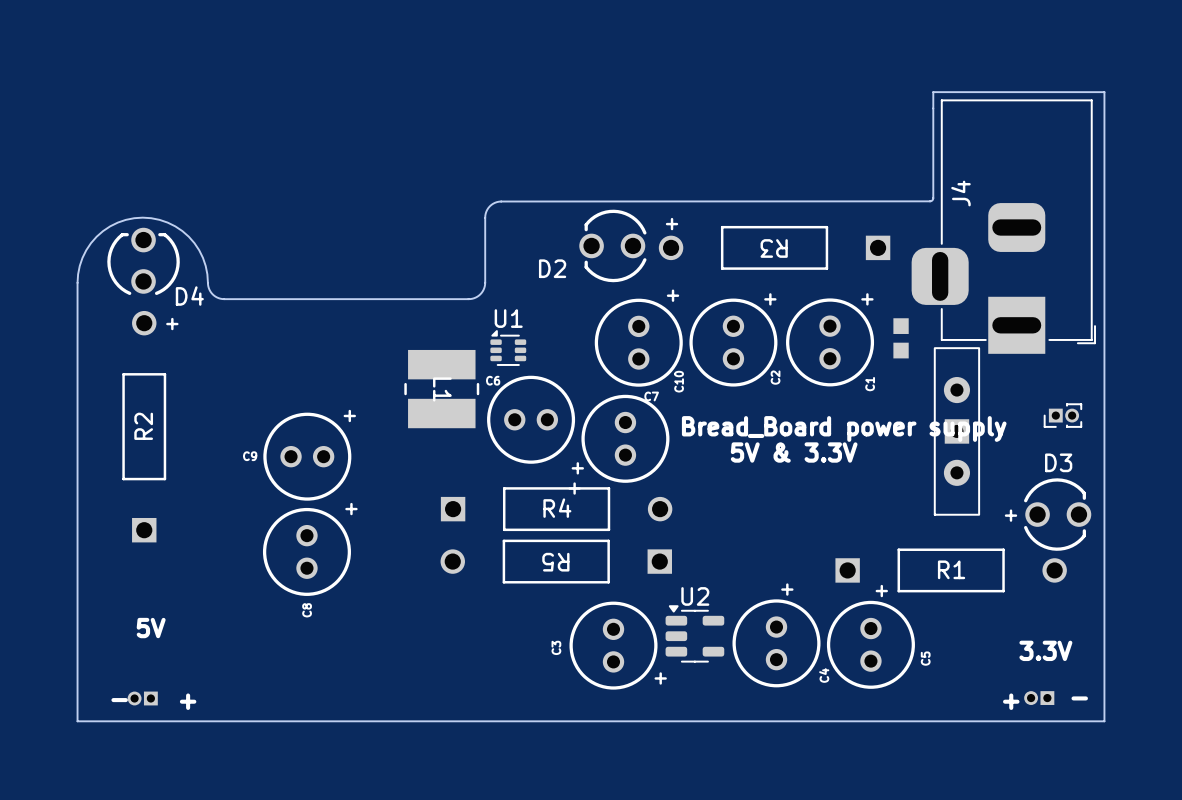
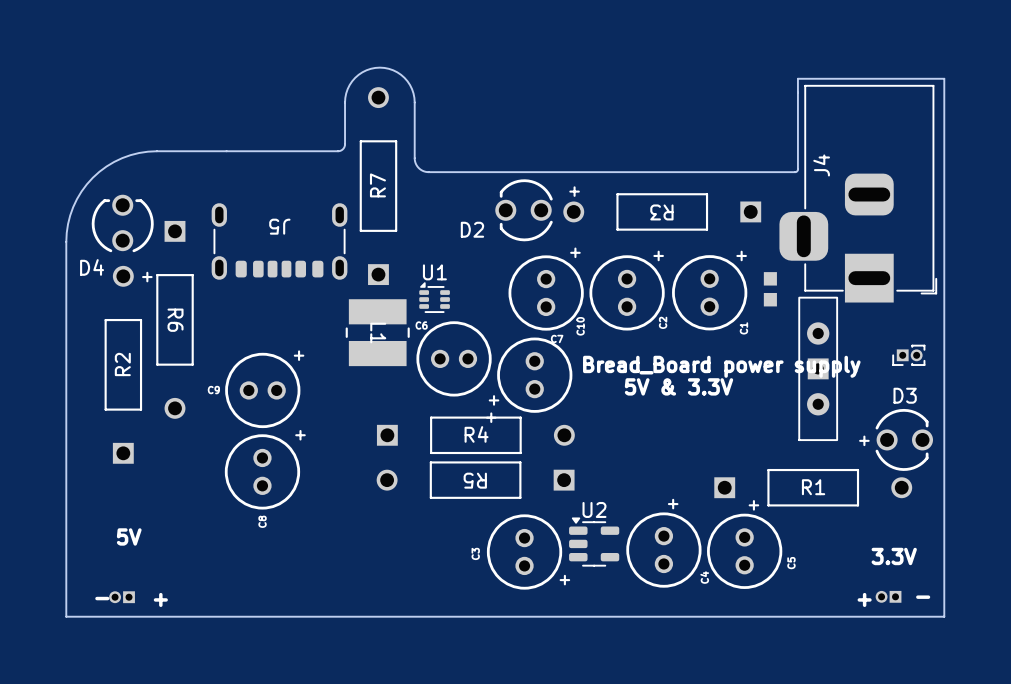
board edge: (930, 201) (497, 202) (488, 207) (485, 215) (484, 288) (478, 295) (468, 299) (220, 298) (214, 295) (209, 289) (202, 257) (188, 236) (175, 226) (159, 219) (134, 218) (110, 226) (91, 243) (79, 265) (77, 282) -> (795, 172) (425, 171) (417, 166) (414, 159) (414, 102) (412, 89) (407, 81) (397, 72) (384, 67) (375, 67) (358, 74) (347, 89) (345, 102) (344, 145) (341, 150) (156, 151) (130, 155) (106, 166) (92, 177) (81, 191) (70, 215) (66, 241)
R7: none -> (378, 186)
J5: none -> (279, 241)
D4 name position: D4 (189, 296) -> D4 (92, 267)
R6: none -> (175, 319)

